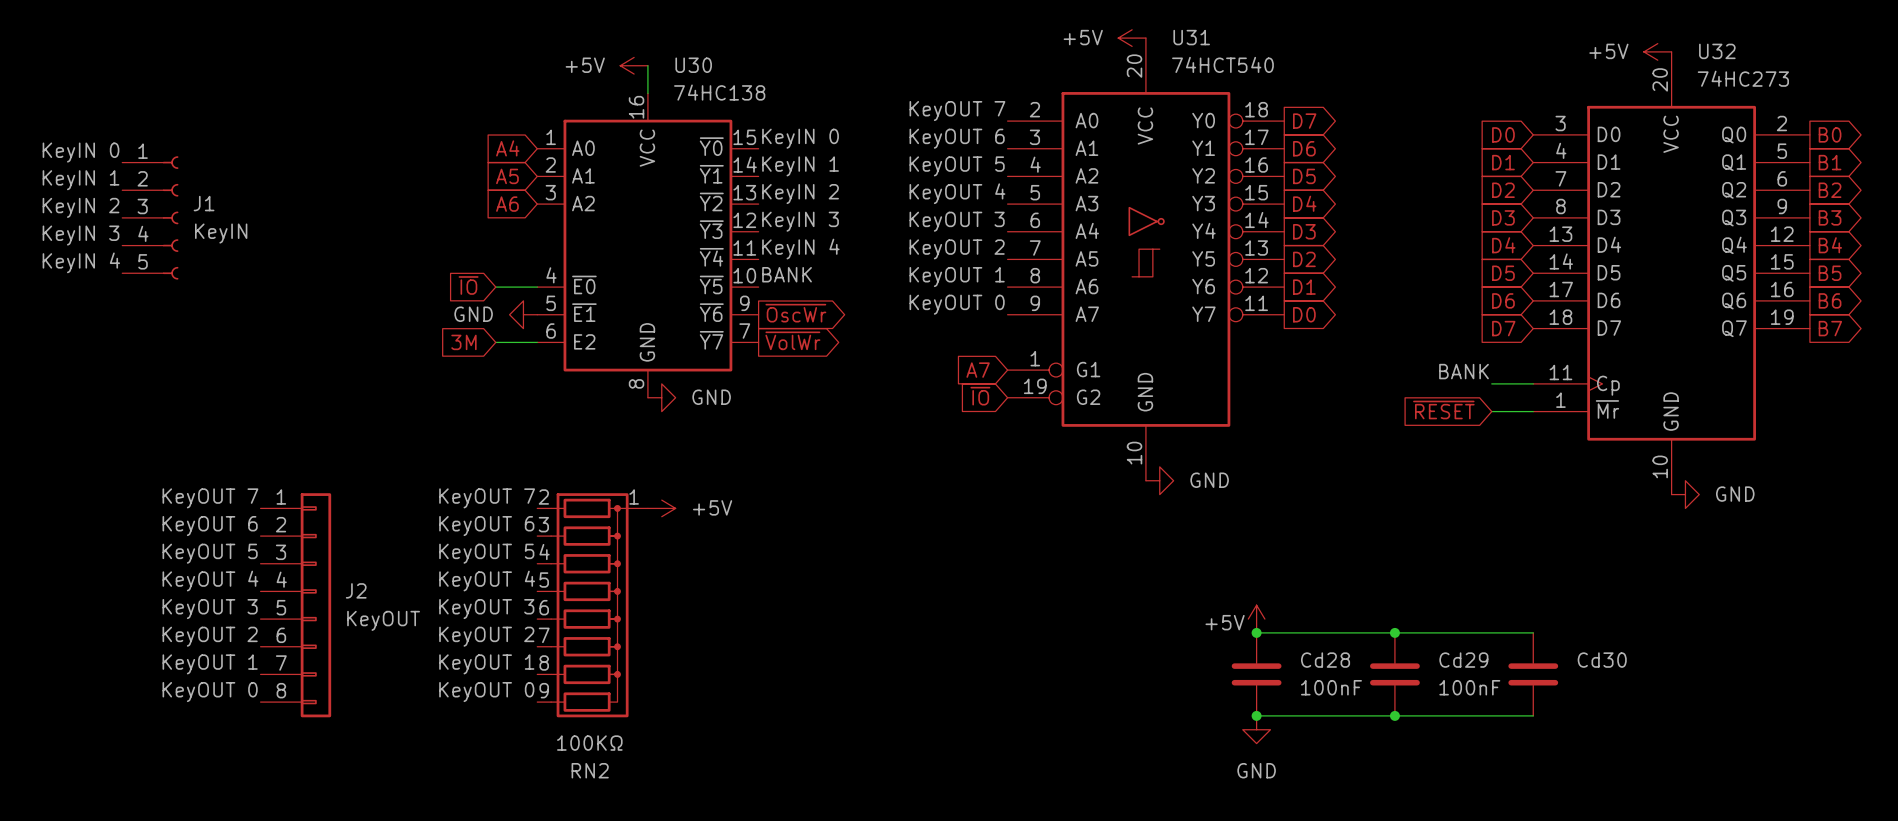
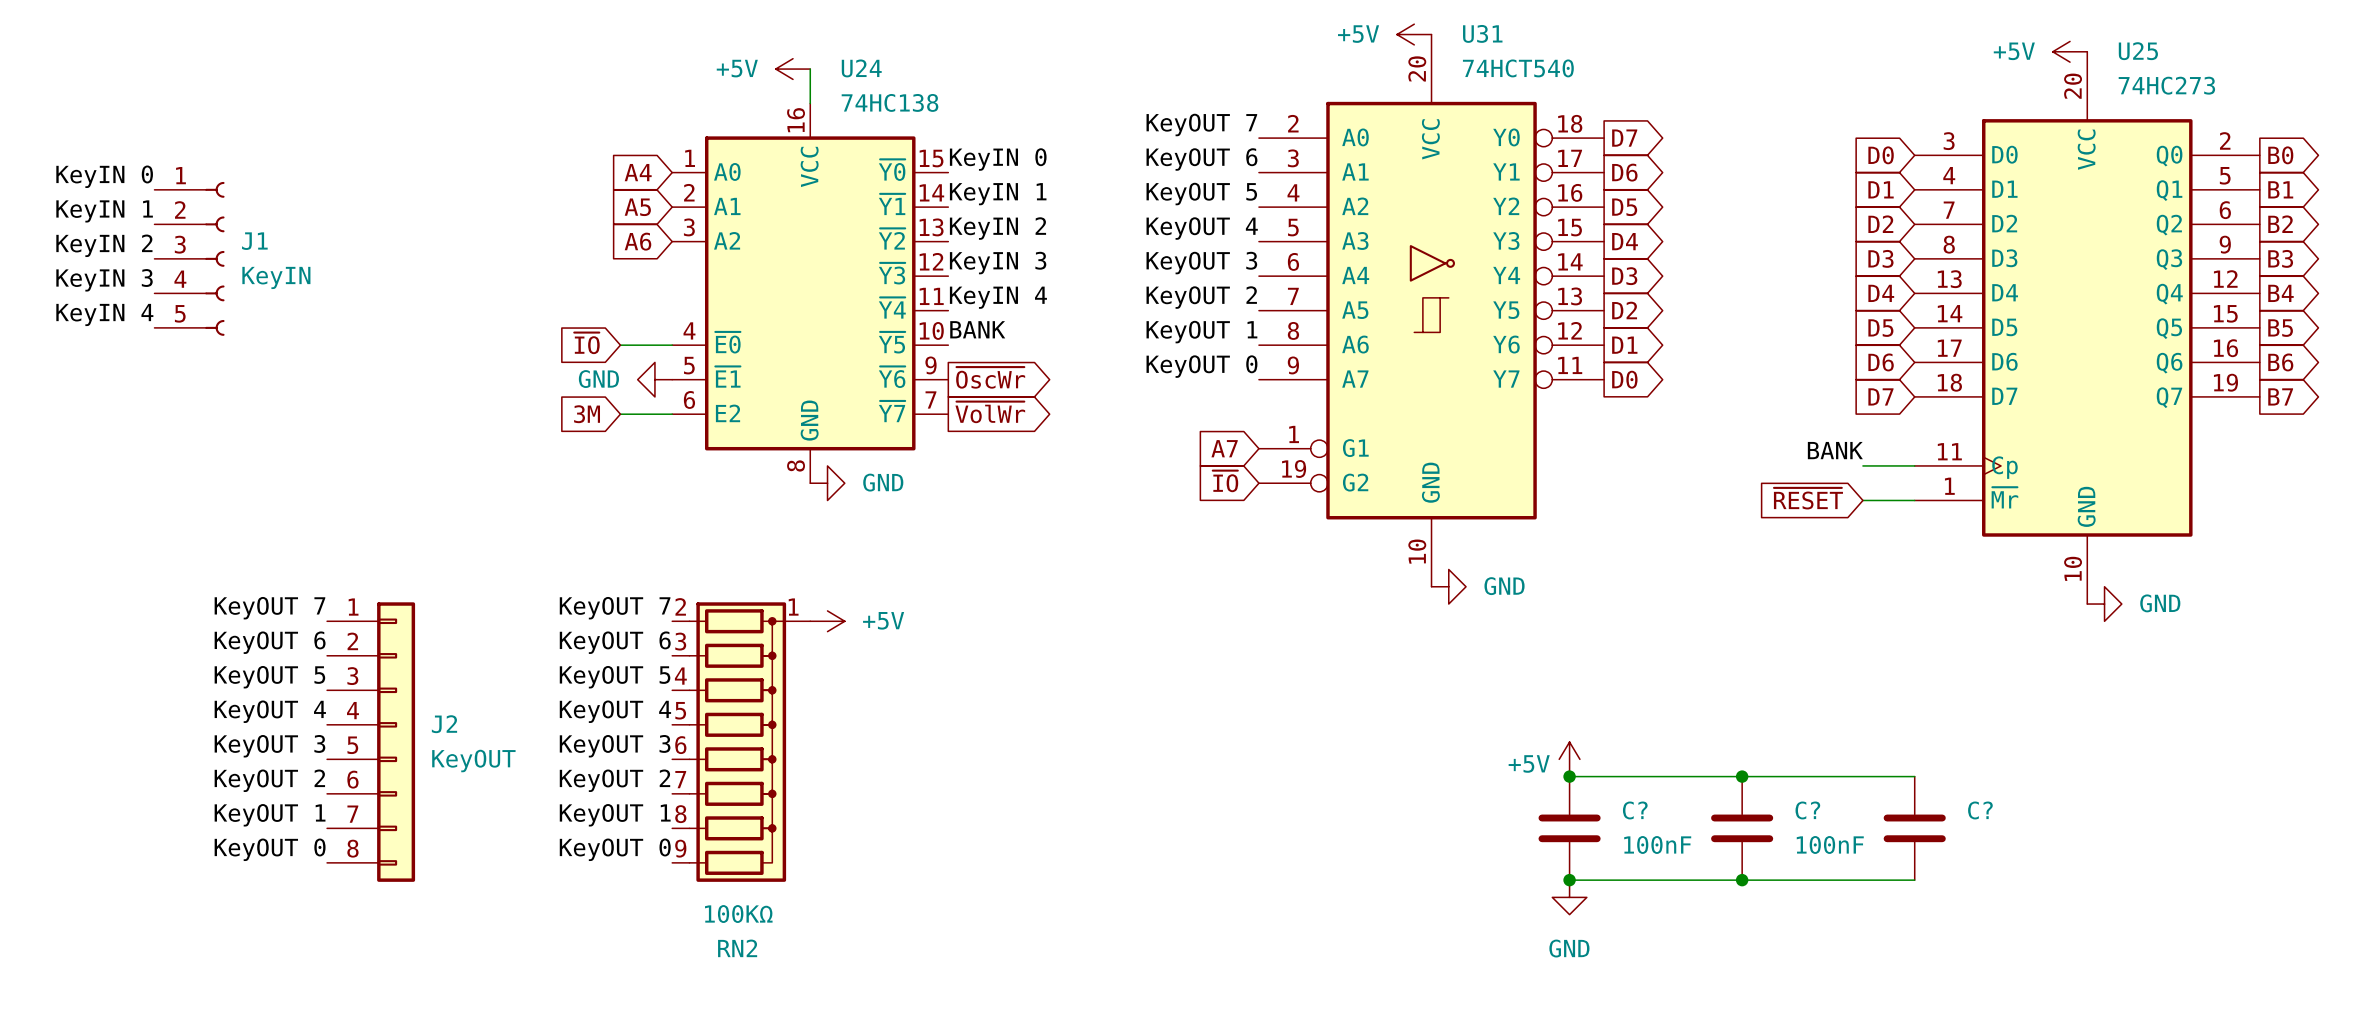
U32 name: U32 (1717, 51) -> U25 (2138, 51)
U30 name: U30 (693, 65) -> U24 (861, 68)
Cd28 name: Cd28 (1325, 660) -> C? (1635, 810)
Cd29 name: Cd29 (1463, 660) -> C? (1807, 810)
Cd30 name: Cd30 (1602, 660) -> C? (1980, 810)

